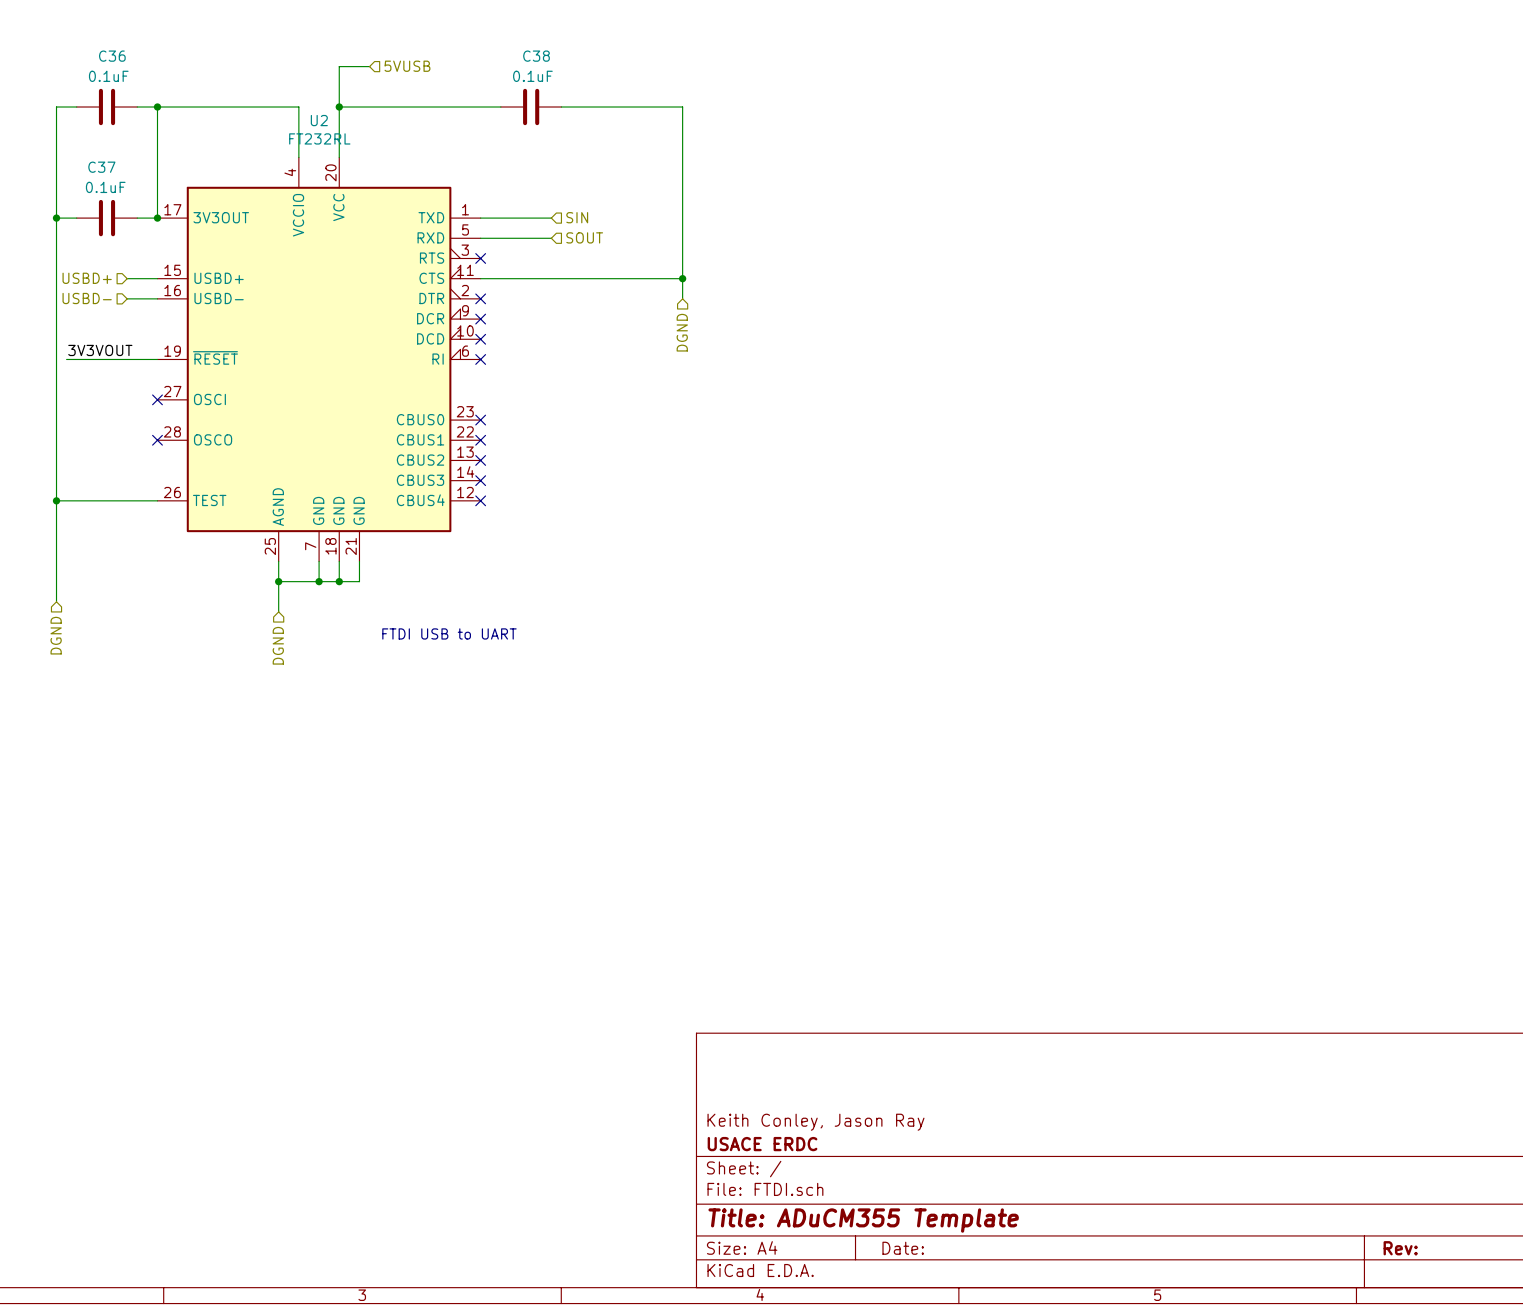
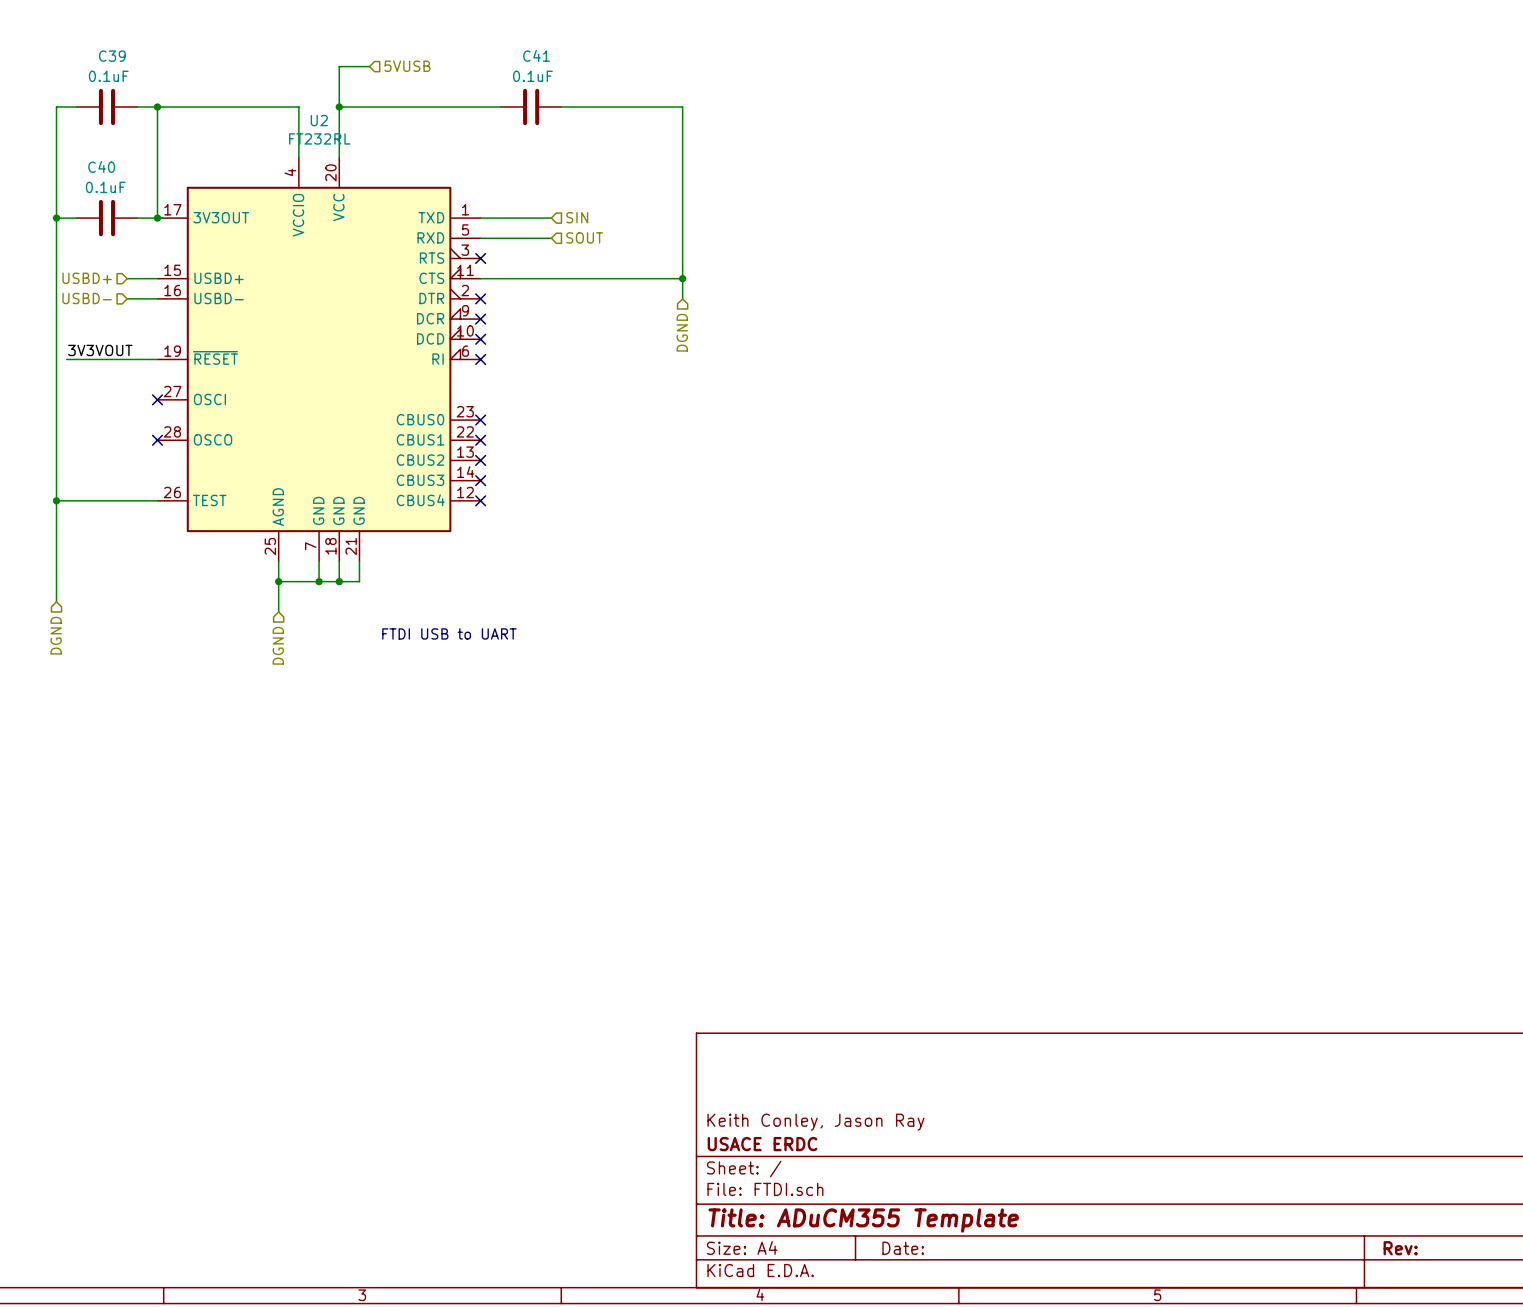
C36 name: C36 (112, 56) -> C39 (112, 56)
C38 name: C38 (536, 56) -> C41 (536, 55)
C37 name: C37 (101, 167) -> C40 (101, 166)

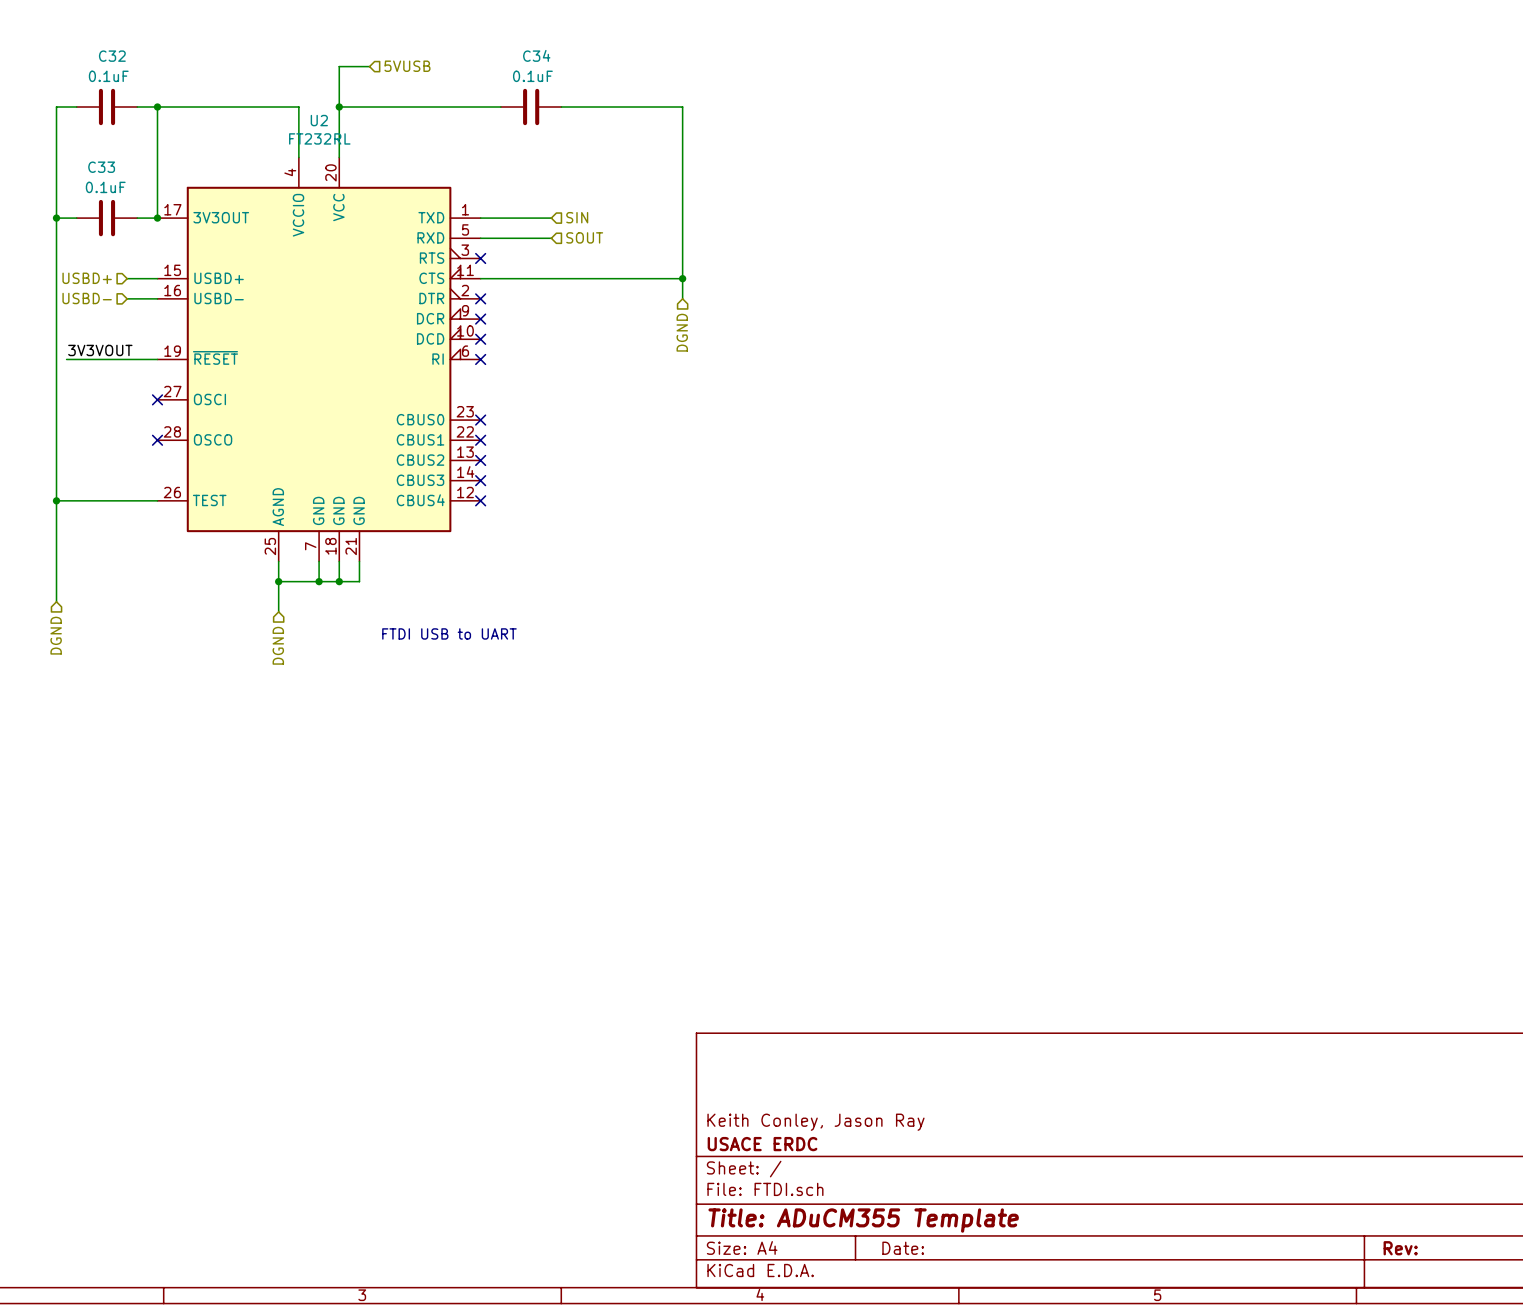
C41 name: C41 (536, 55) -> C34 (536, 55)
C39 name: C39 (112, 56) -> C32 (112, 56)
C40 name: C40 (101, 166) -> C33 (101, 167)

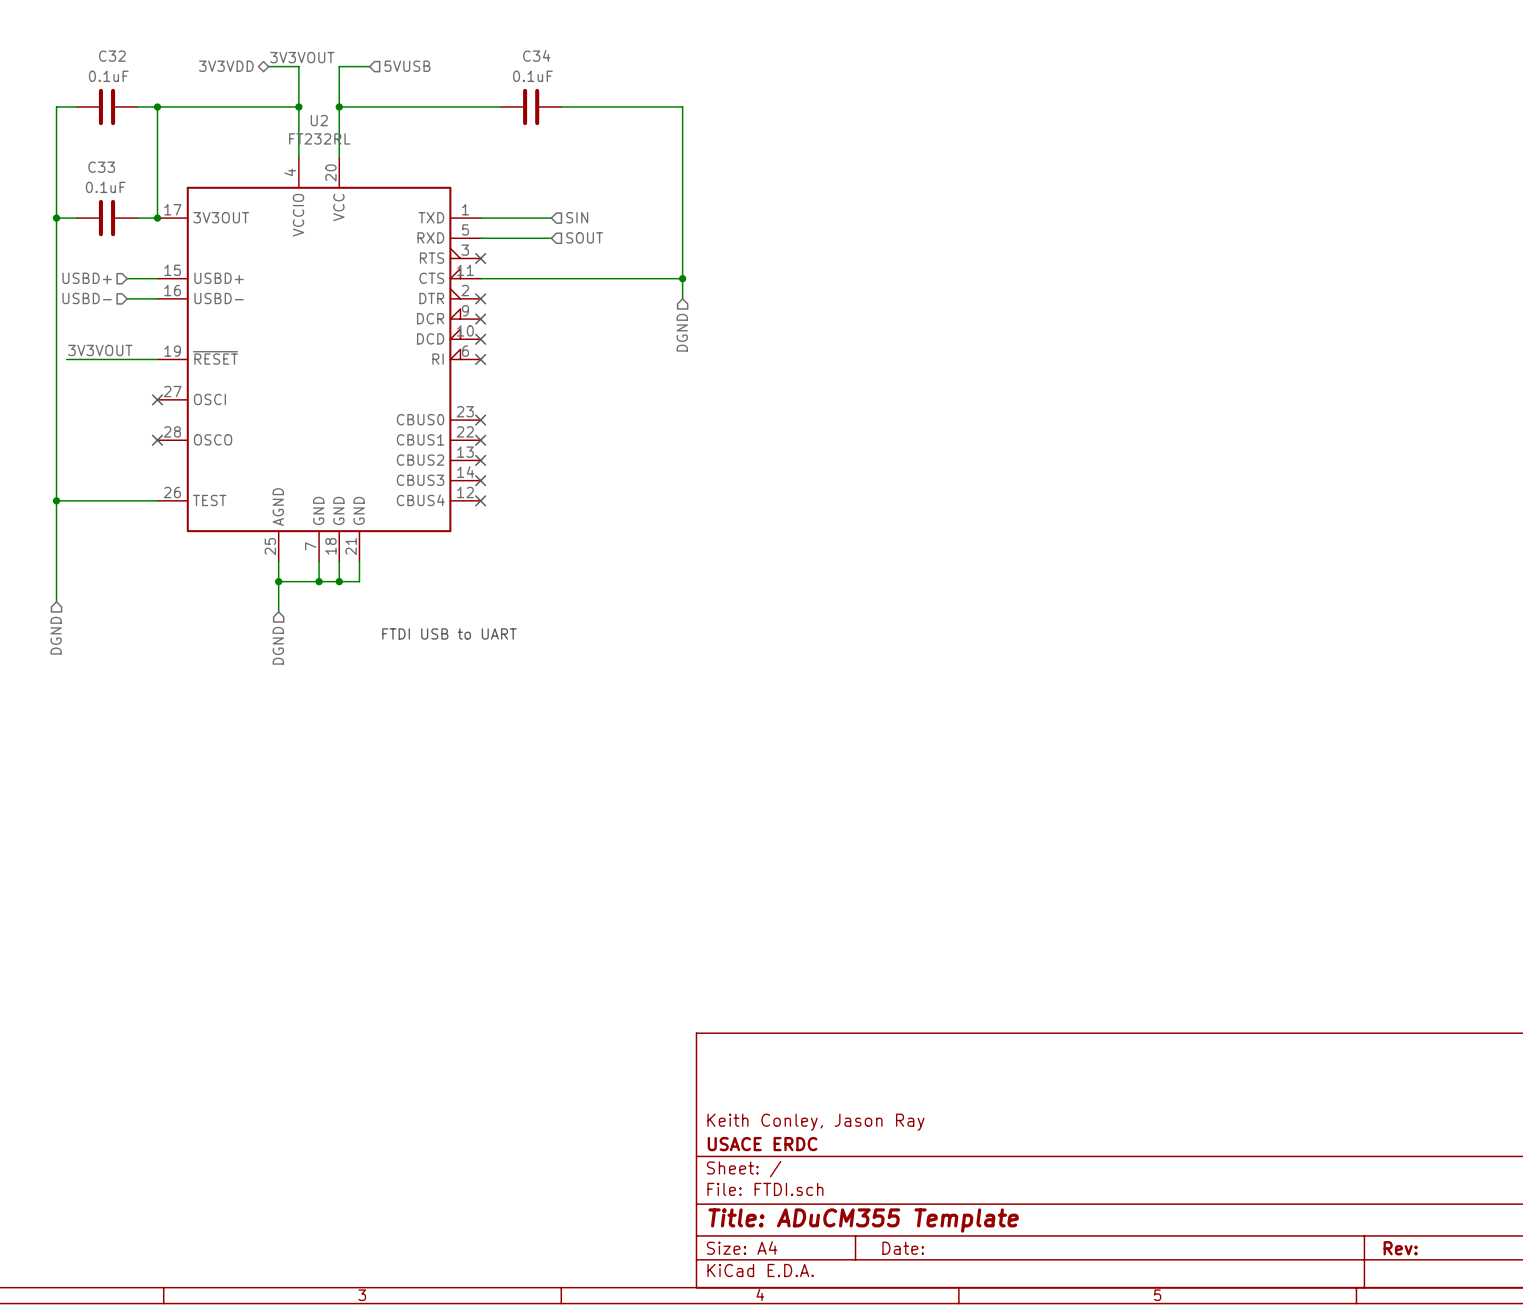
label: none -> 3V3VOUT (302, 57)
hierarchical label: none -> 3V3VDD (226, 66)
wire: none -> (268, 66) (298, 66) (298, 107)
junction: none -> (298, 107)

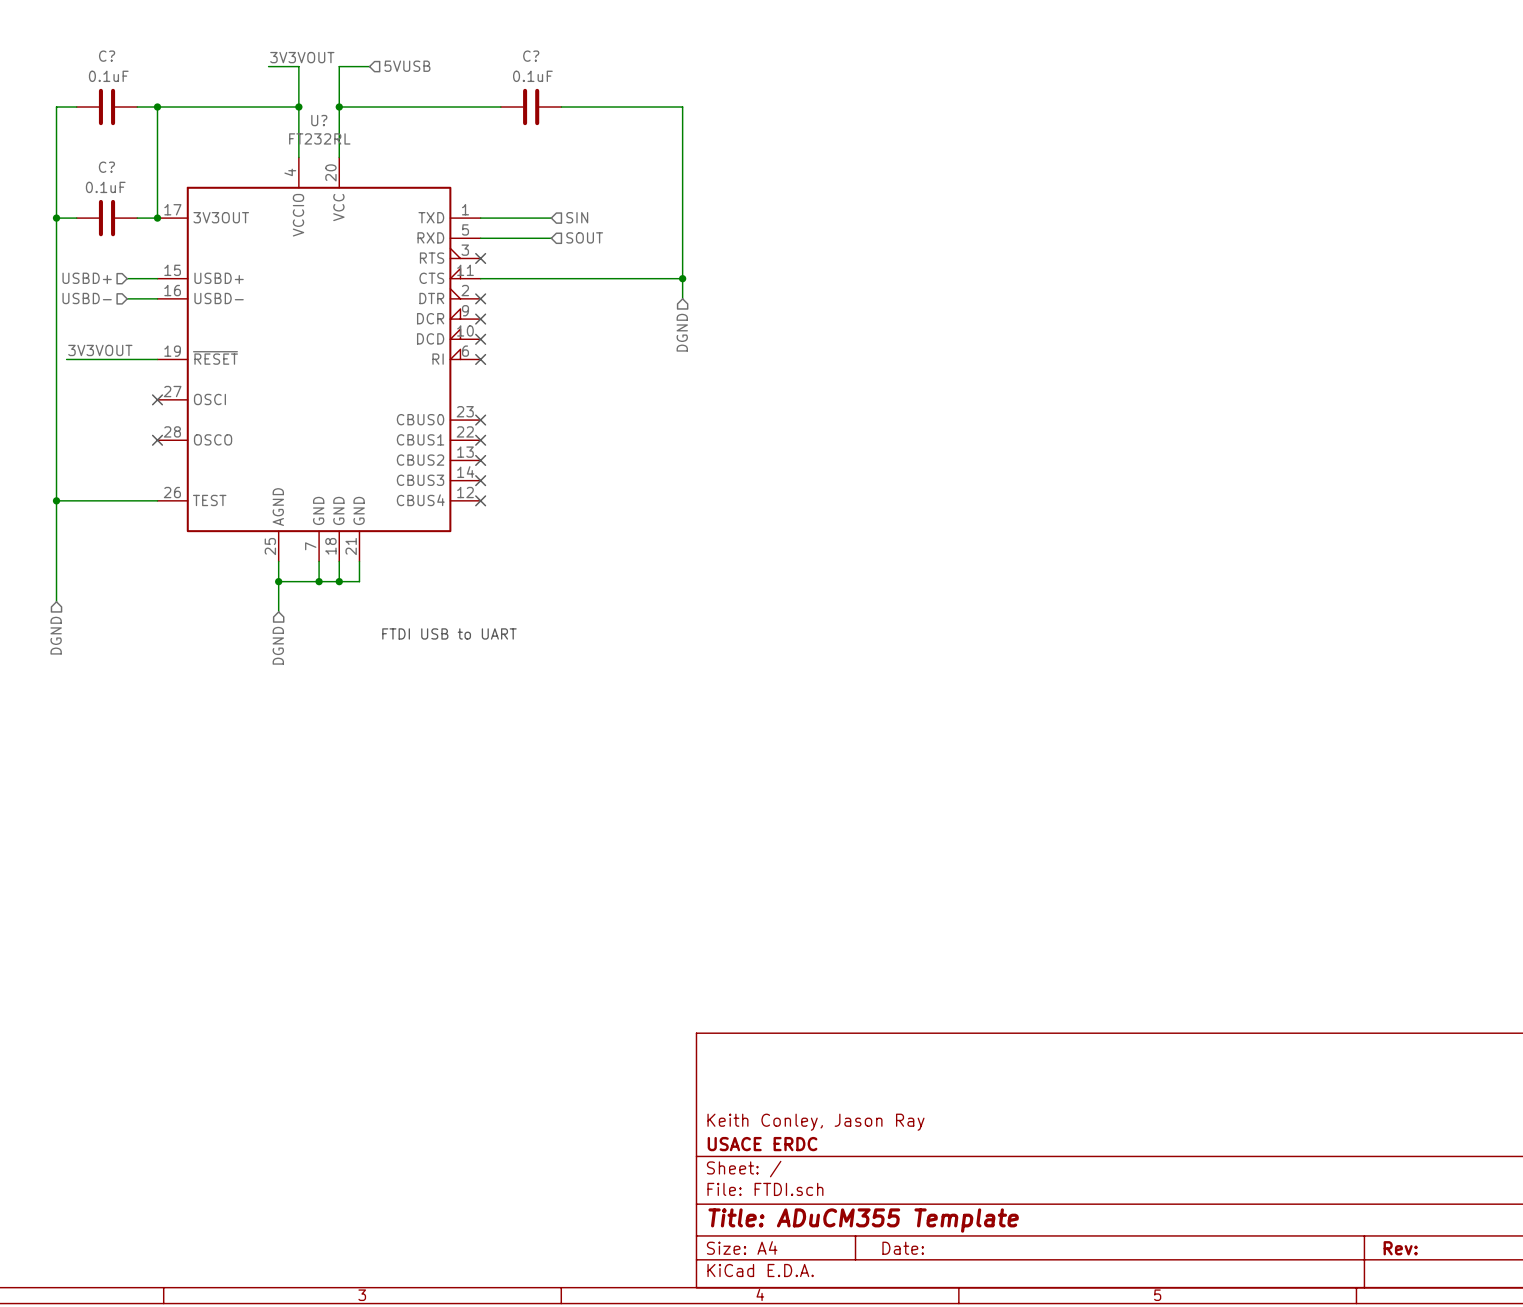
C34 name: C34 (536, 55) -> C? (531, 56)
C32 name: C32 (112, 56) -> C? (107, 56)
hierarchical label: 3V3VDD (226, 66) -> none
U2 name: U2 (319, 120) -> U? (319, 120)
C33 name: C33 (101, 167) -> C? (106, 167)

